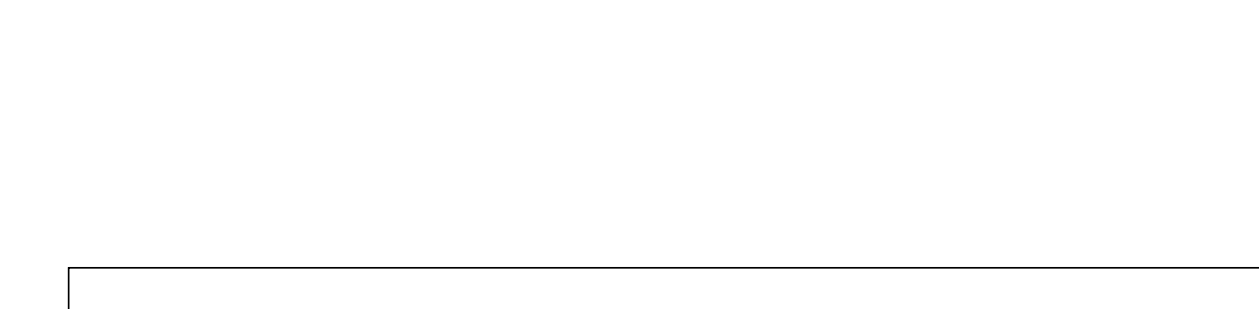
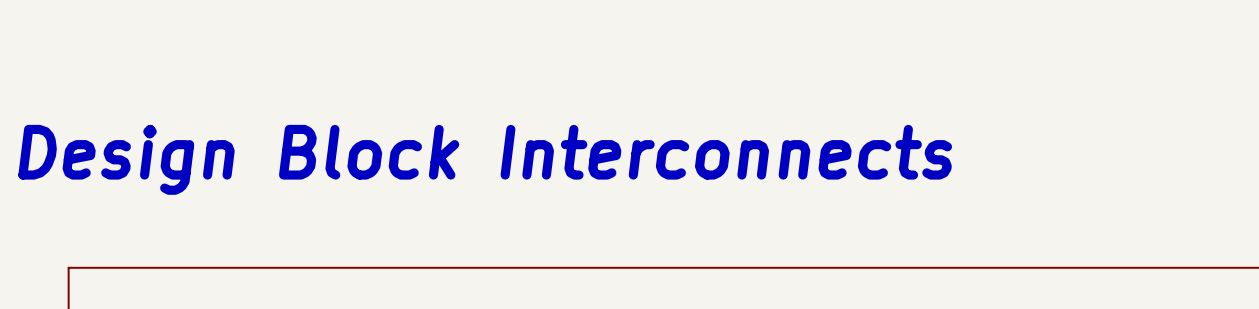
text: none -> Design Block Interconnects (485, 159)

